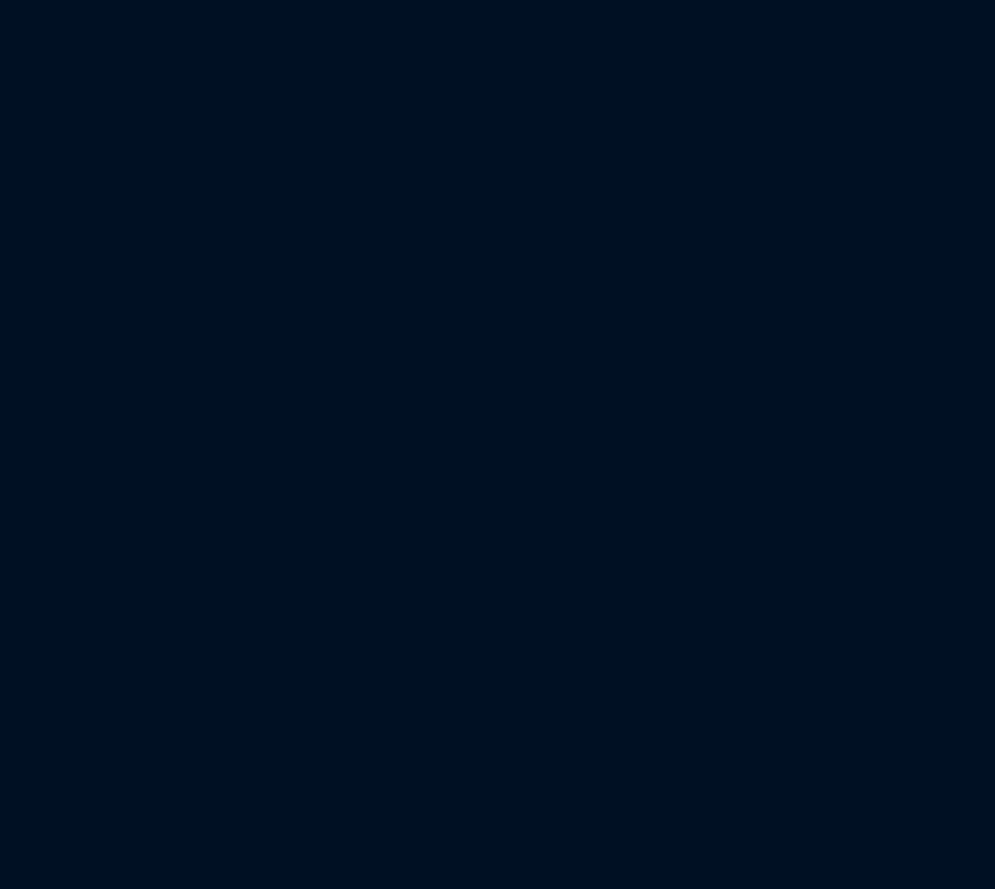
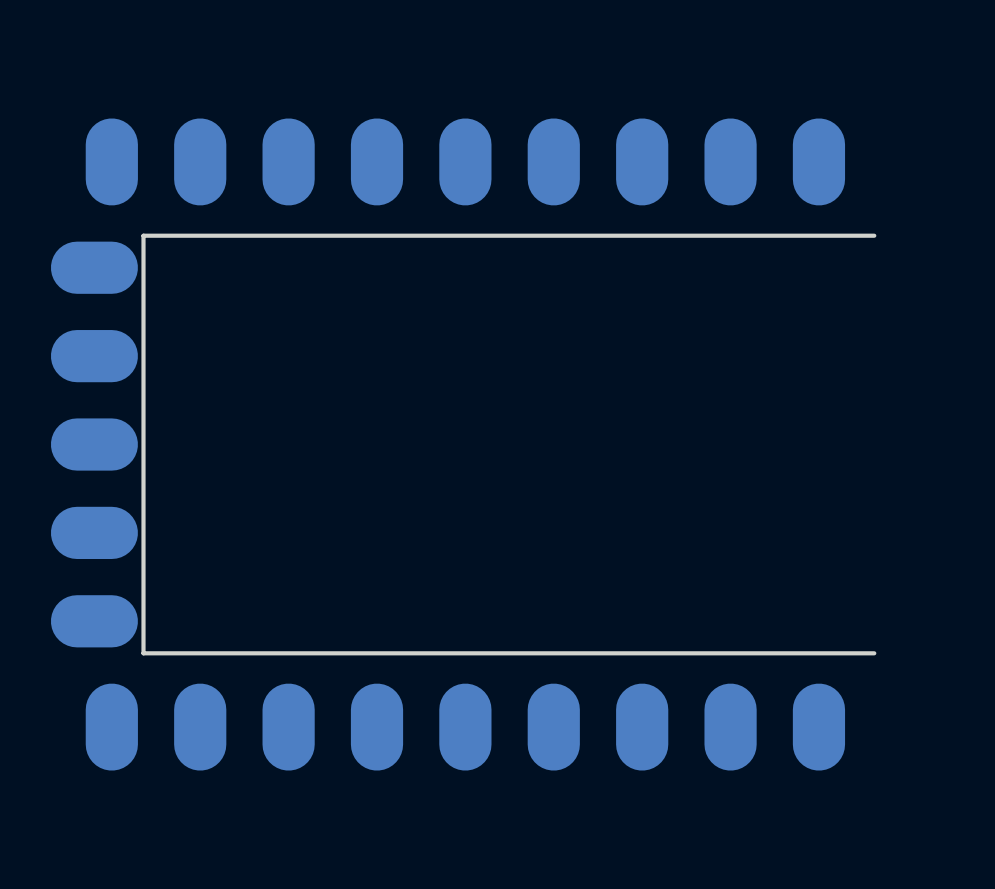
part: none -> (463, 444)

